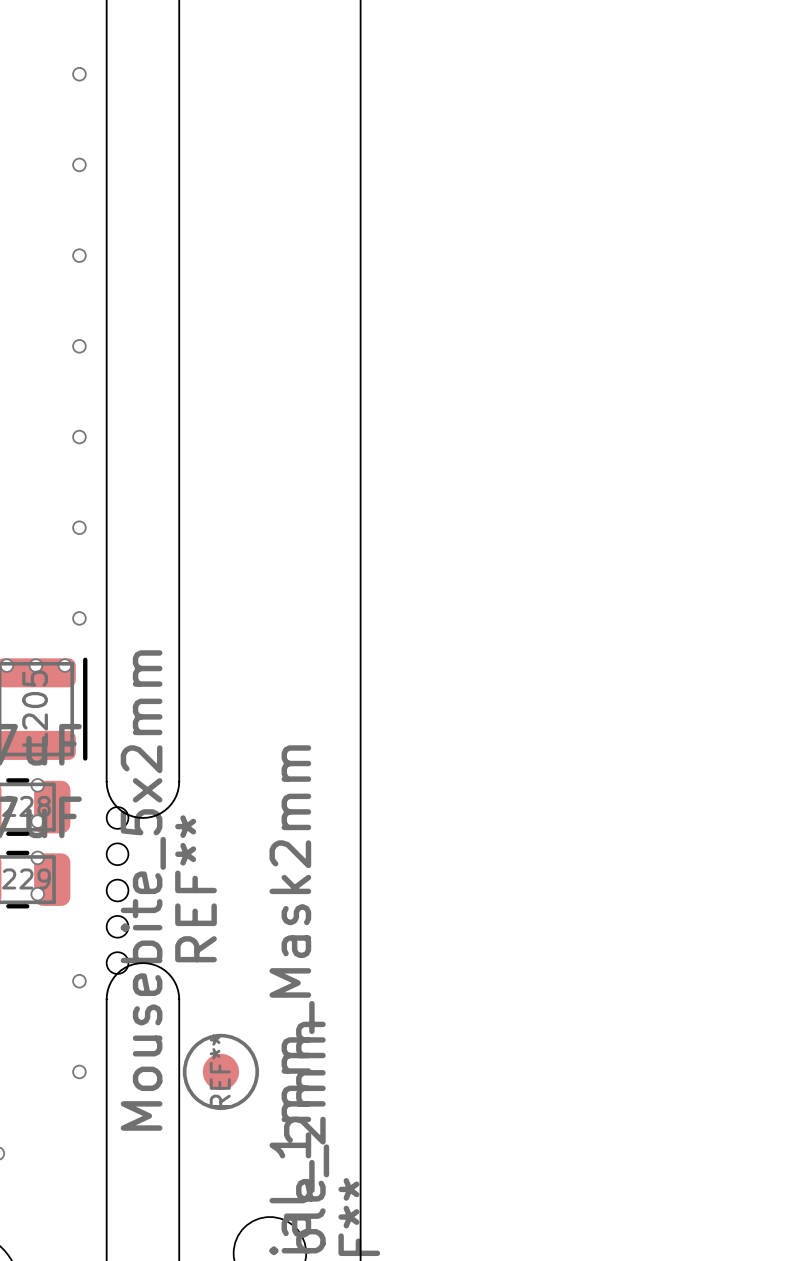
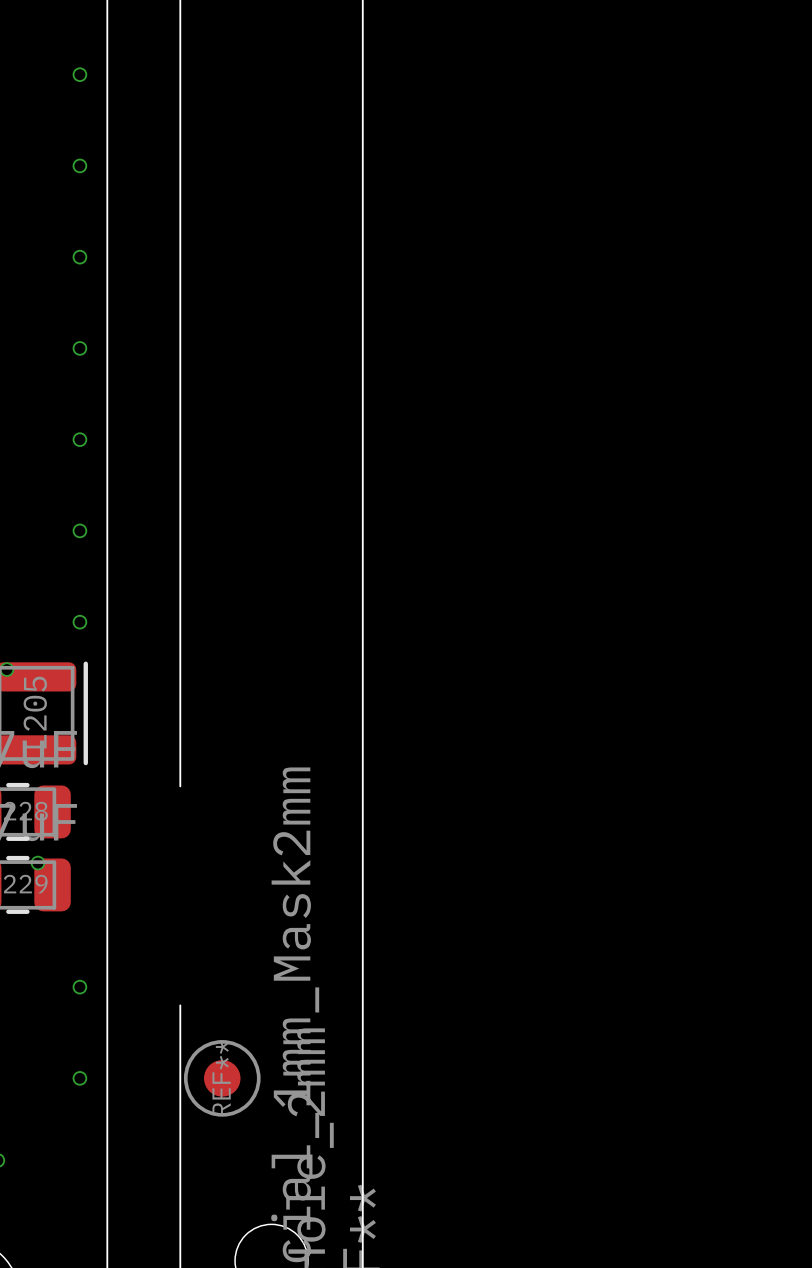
via: (35, 665) -> none
via: (64, 665) -> none
board edge: none -> (107, 786) (107, 1005)
via: (37, 785) -> none
via: (37, 821) -> none
REF**: Mousebite_5x2mm (142, 890) -> none
via: (37, 894) -> none

